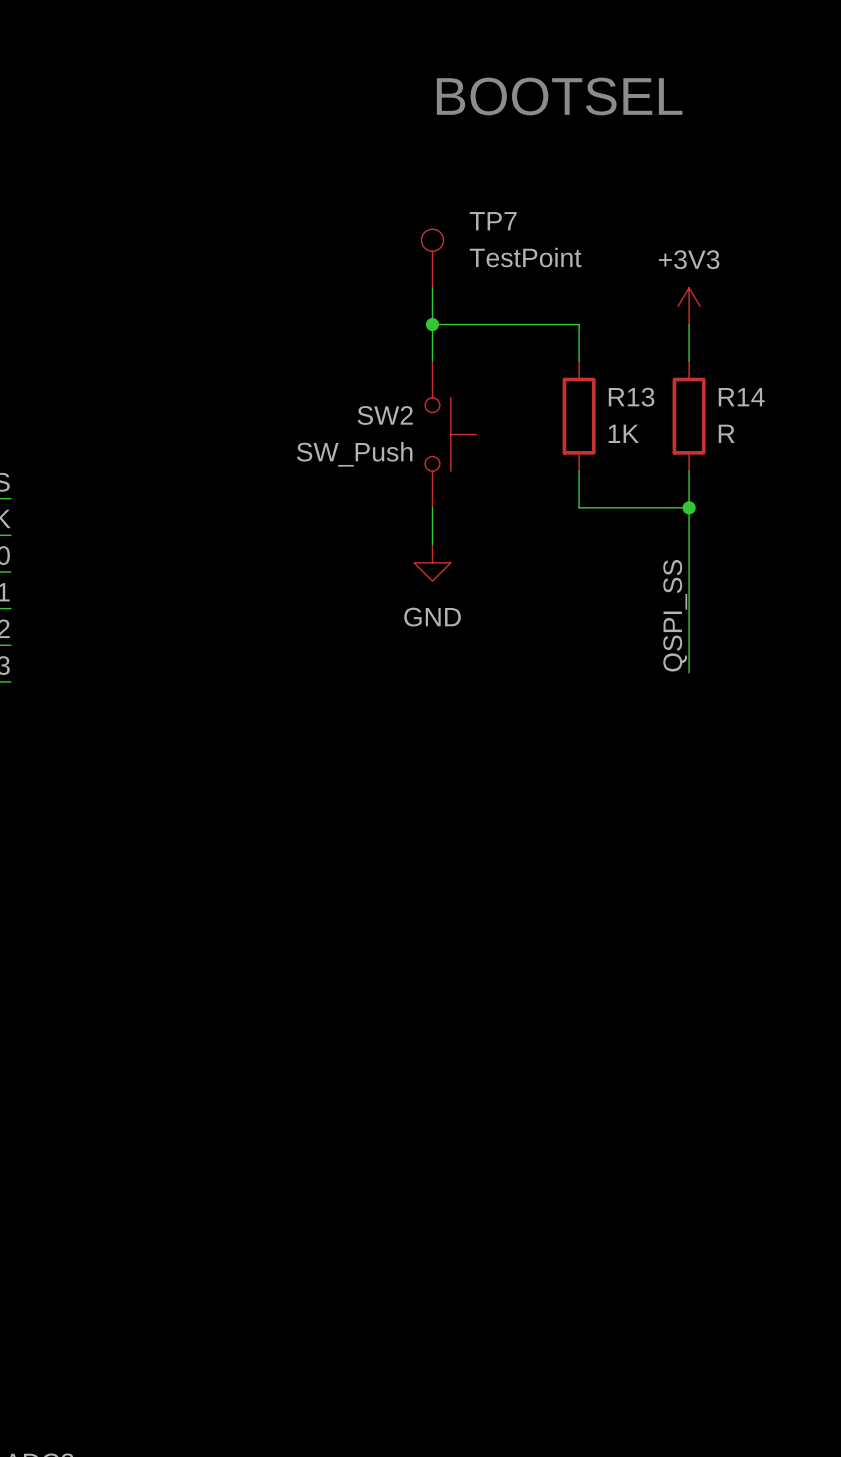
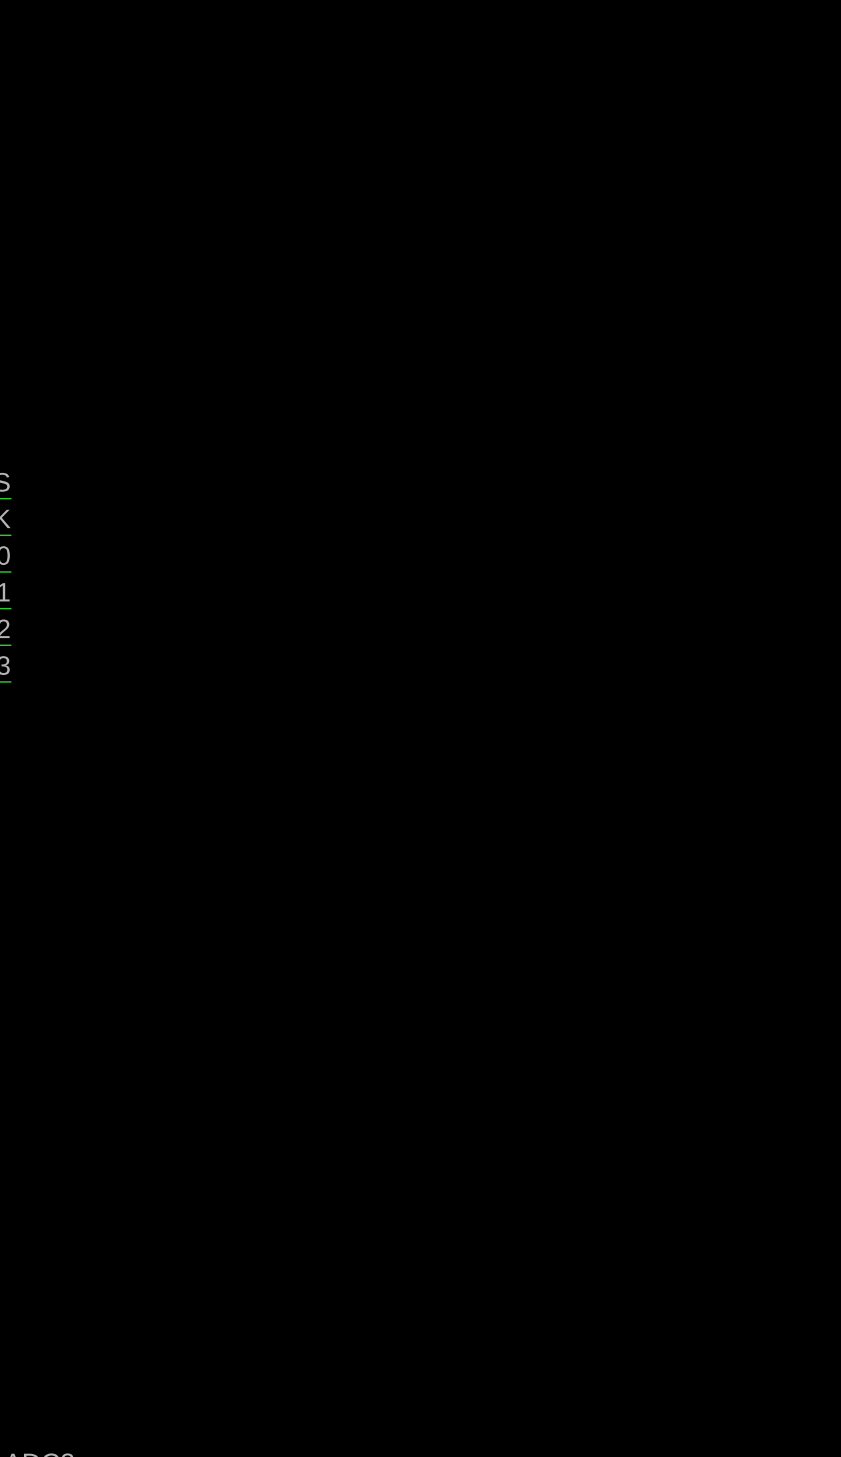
text: BOOTSEL (559, 96) -> none
TP7: TestPoint (432, 258) -> none
wire: (432, 287) (432, 361) -> none
power symbol: +3V3 (689, 306) -> none
wire: (432, 324) (579, 324) (579, 361) -> none
junction: (432, 324) -> none
wire: (689, 324) (689, 361) -> none
R13: 1K (579, 416) -> none
R14: R (689, 416) -> none
SW2: SW_Push (450, 434) -> none
wire: (579, 471) (579, 507) (689, 507) -> none
wire: (689, 471) (689, 672) -> none
wire: (432, 507) (432, 544) -> none
junction: (689, 507) -> none
power symbol: GND (432, 562) -> none
label: QSPI_SS (675, 615) -> none

